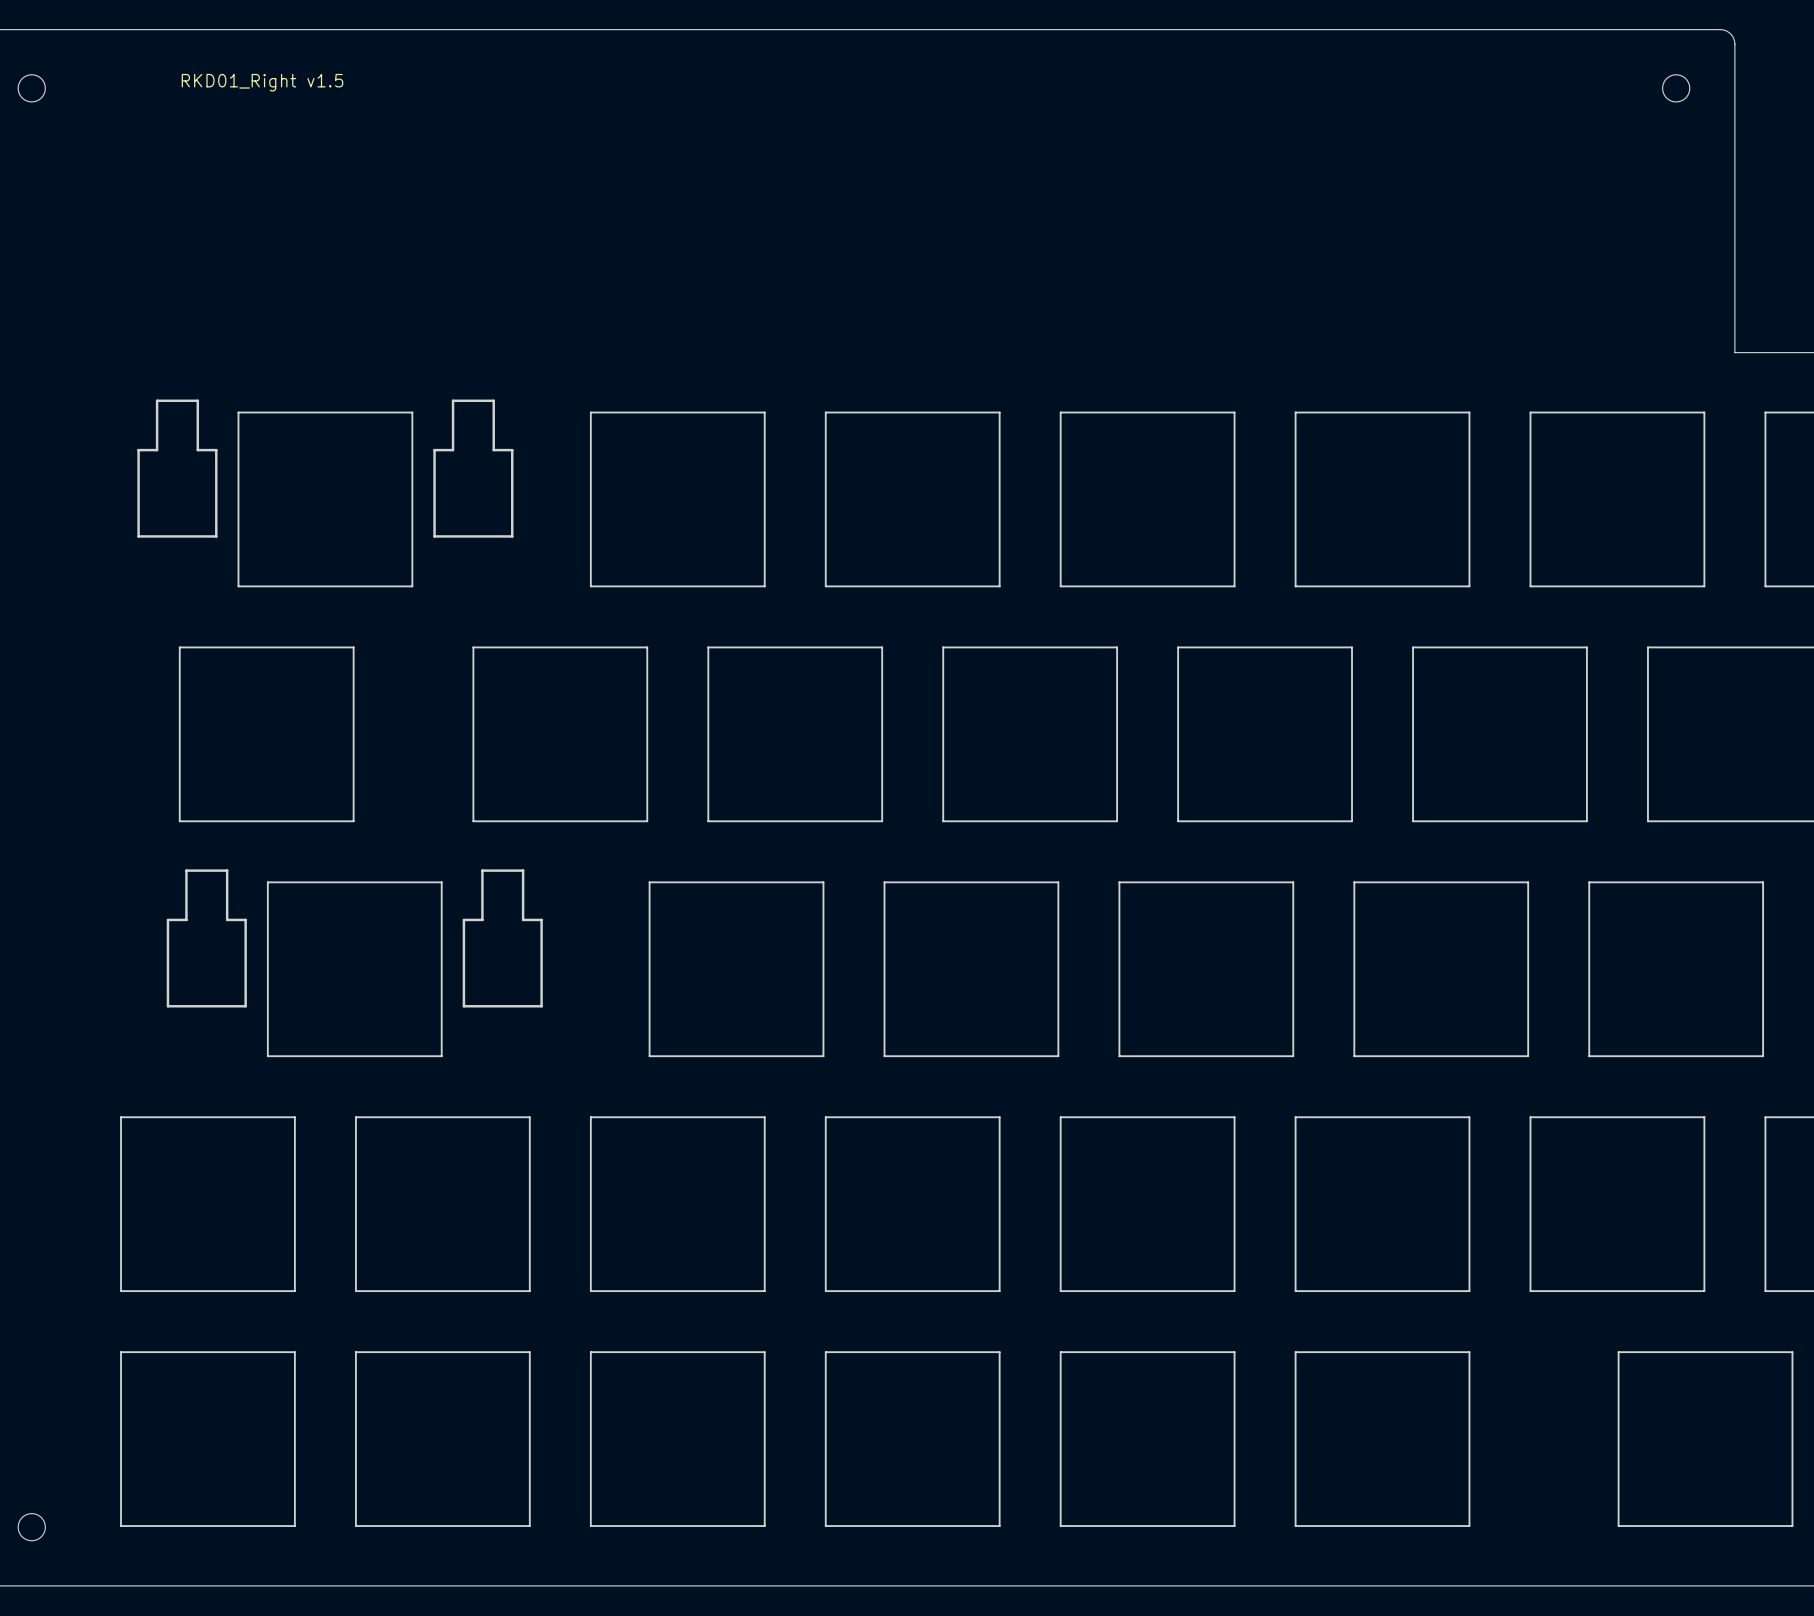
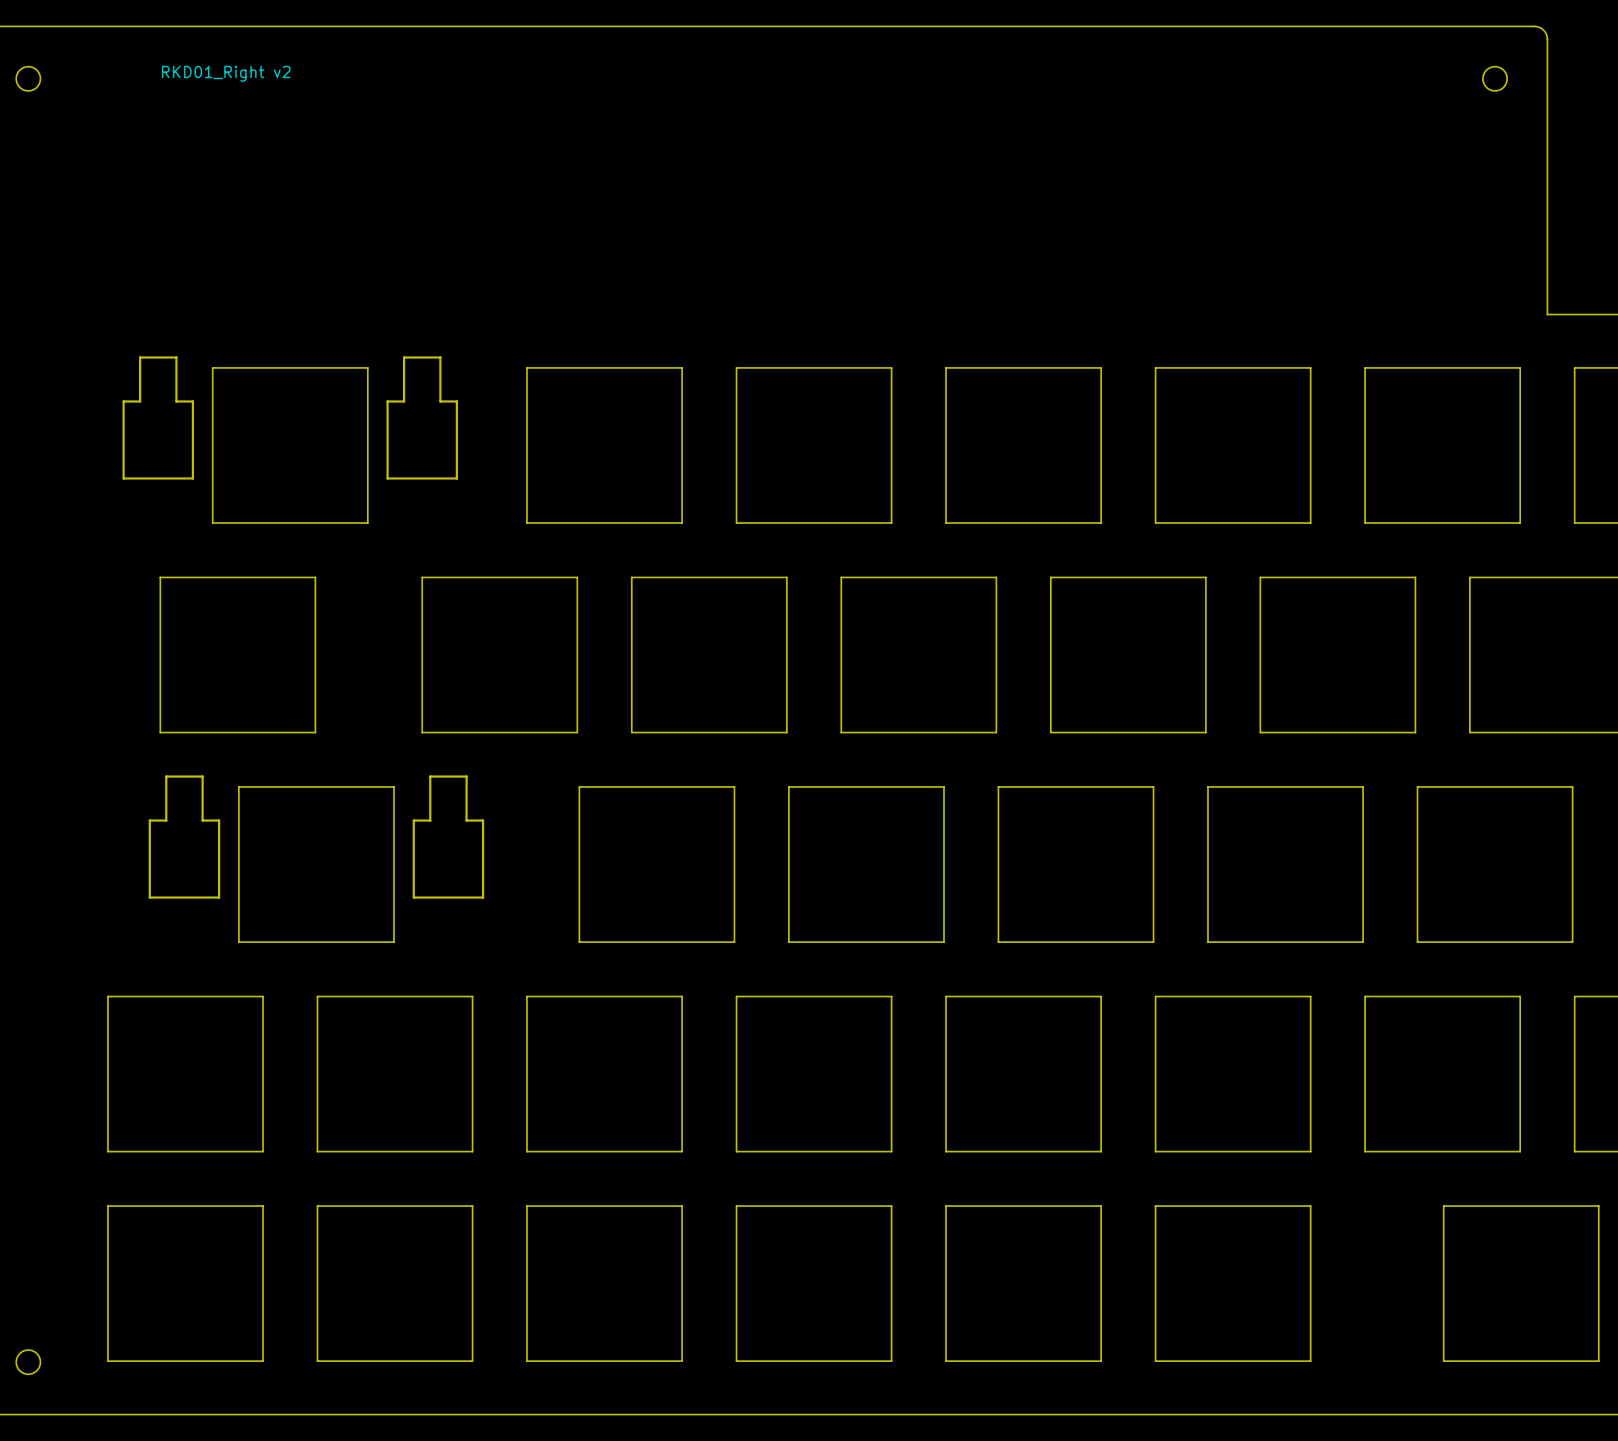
text: RKD01_Right v1.5 (262, 82) -> RKD01_Right v2 (226, 73)

